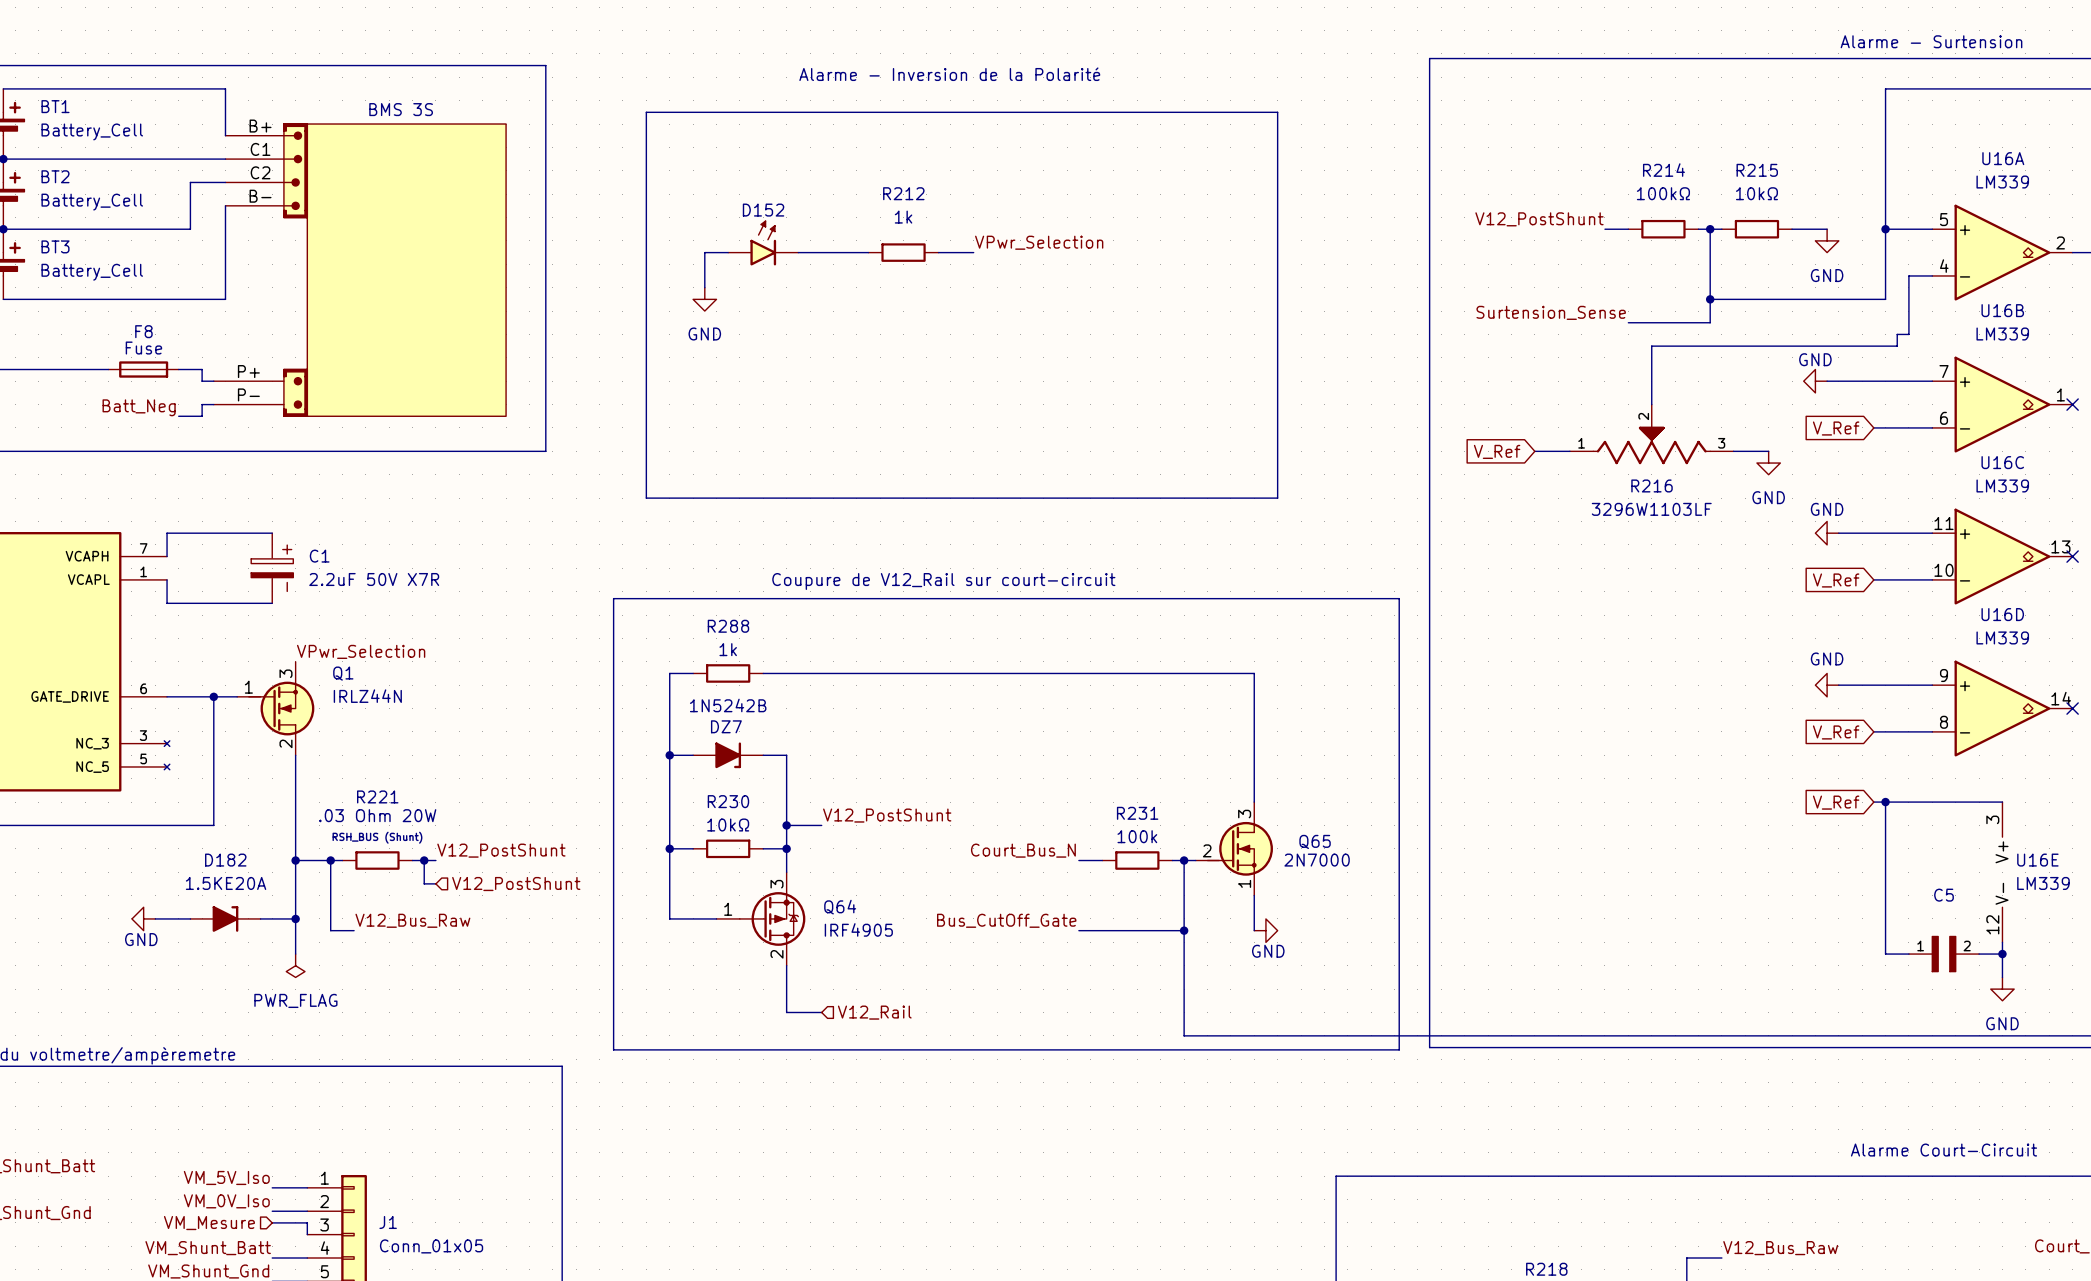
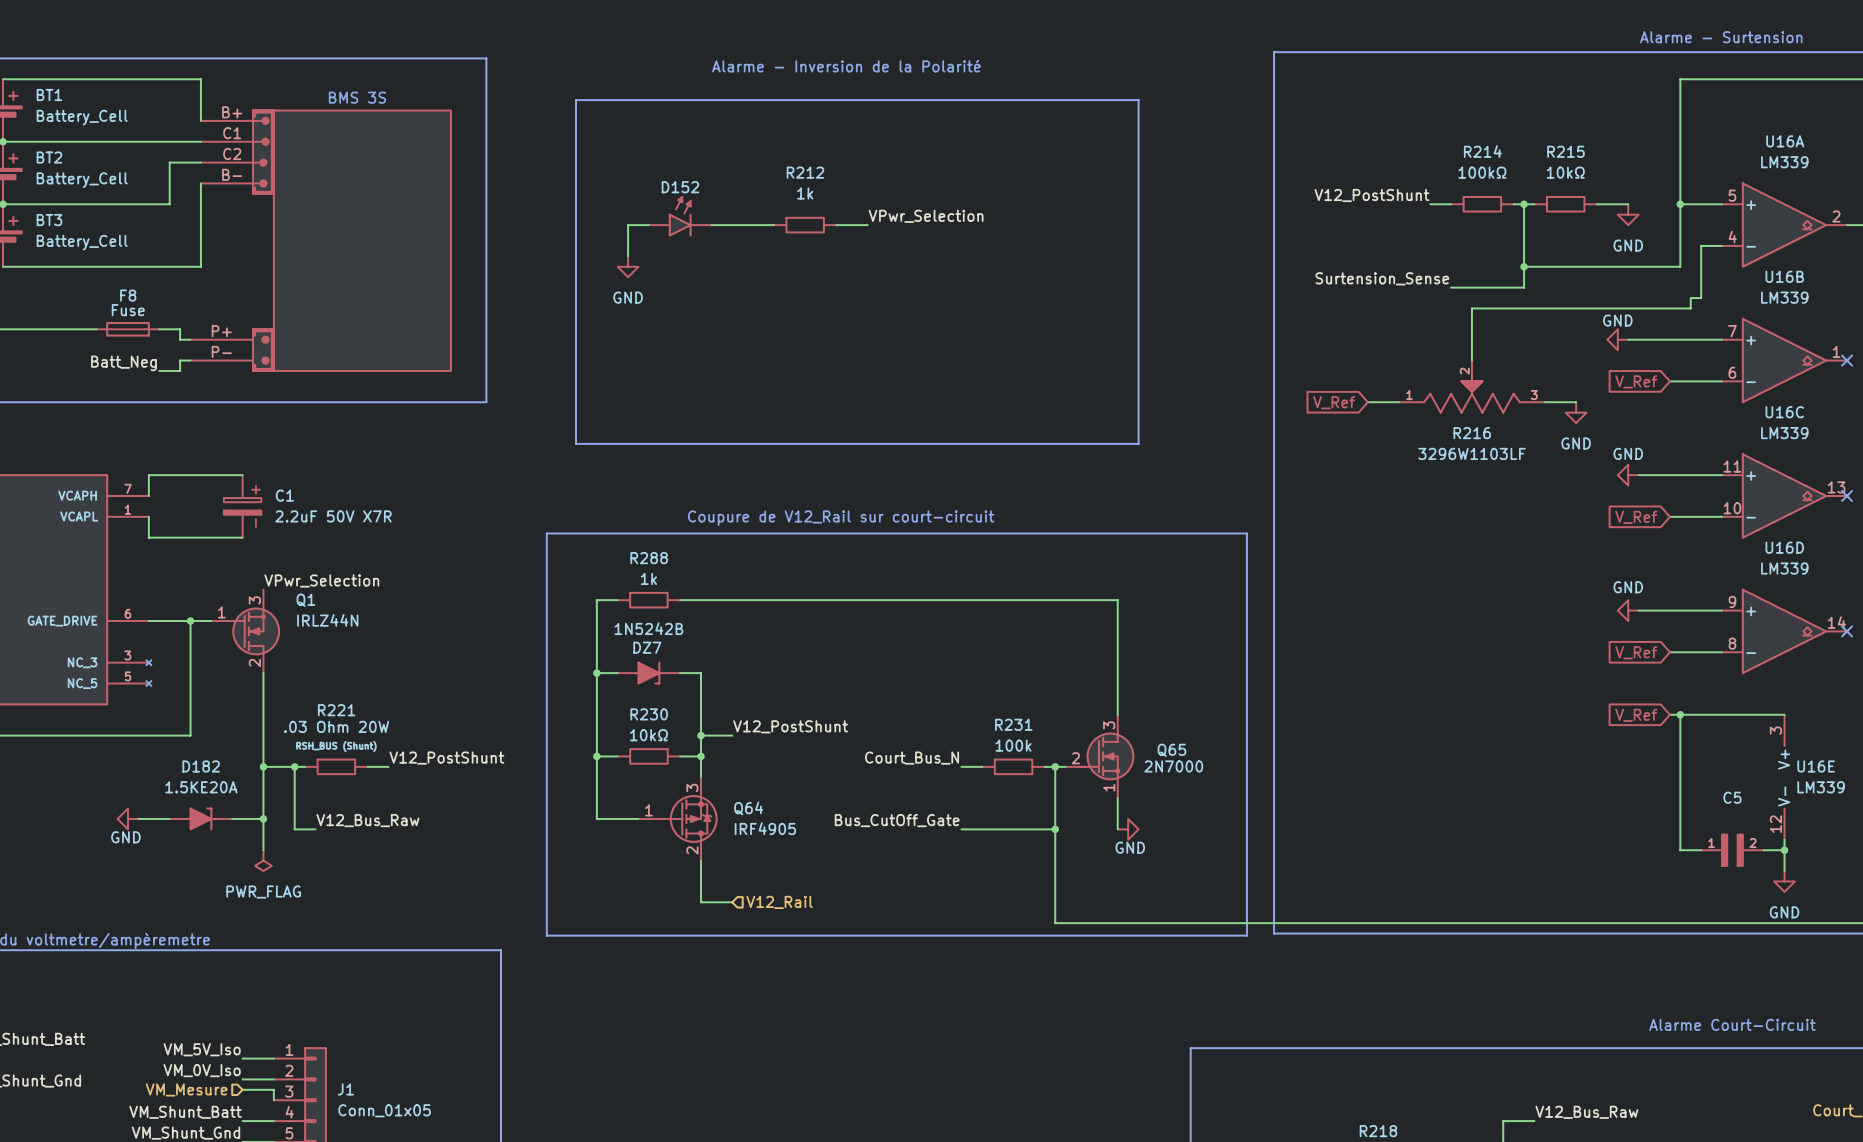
wire: (424, 860) (424, 883) (435, 883) -> none
junction: (424, 860) -> none
hierarchical label: V12_PostShunt (516, 884) -> none

